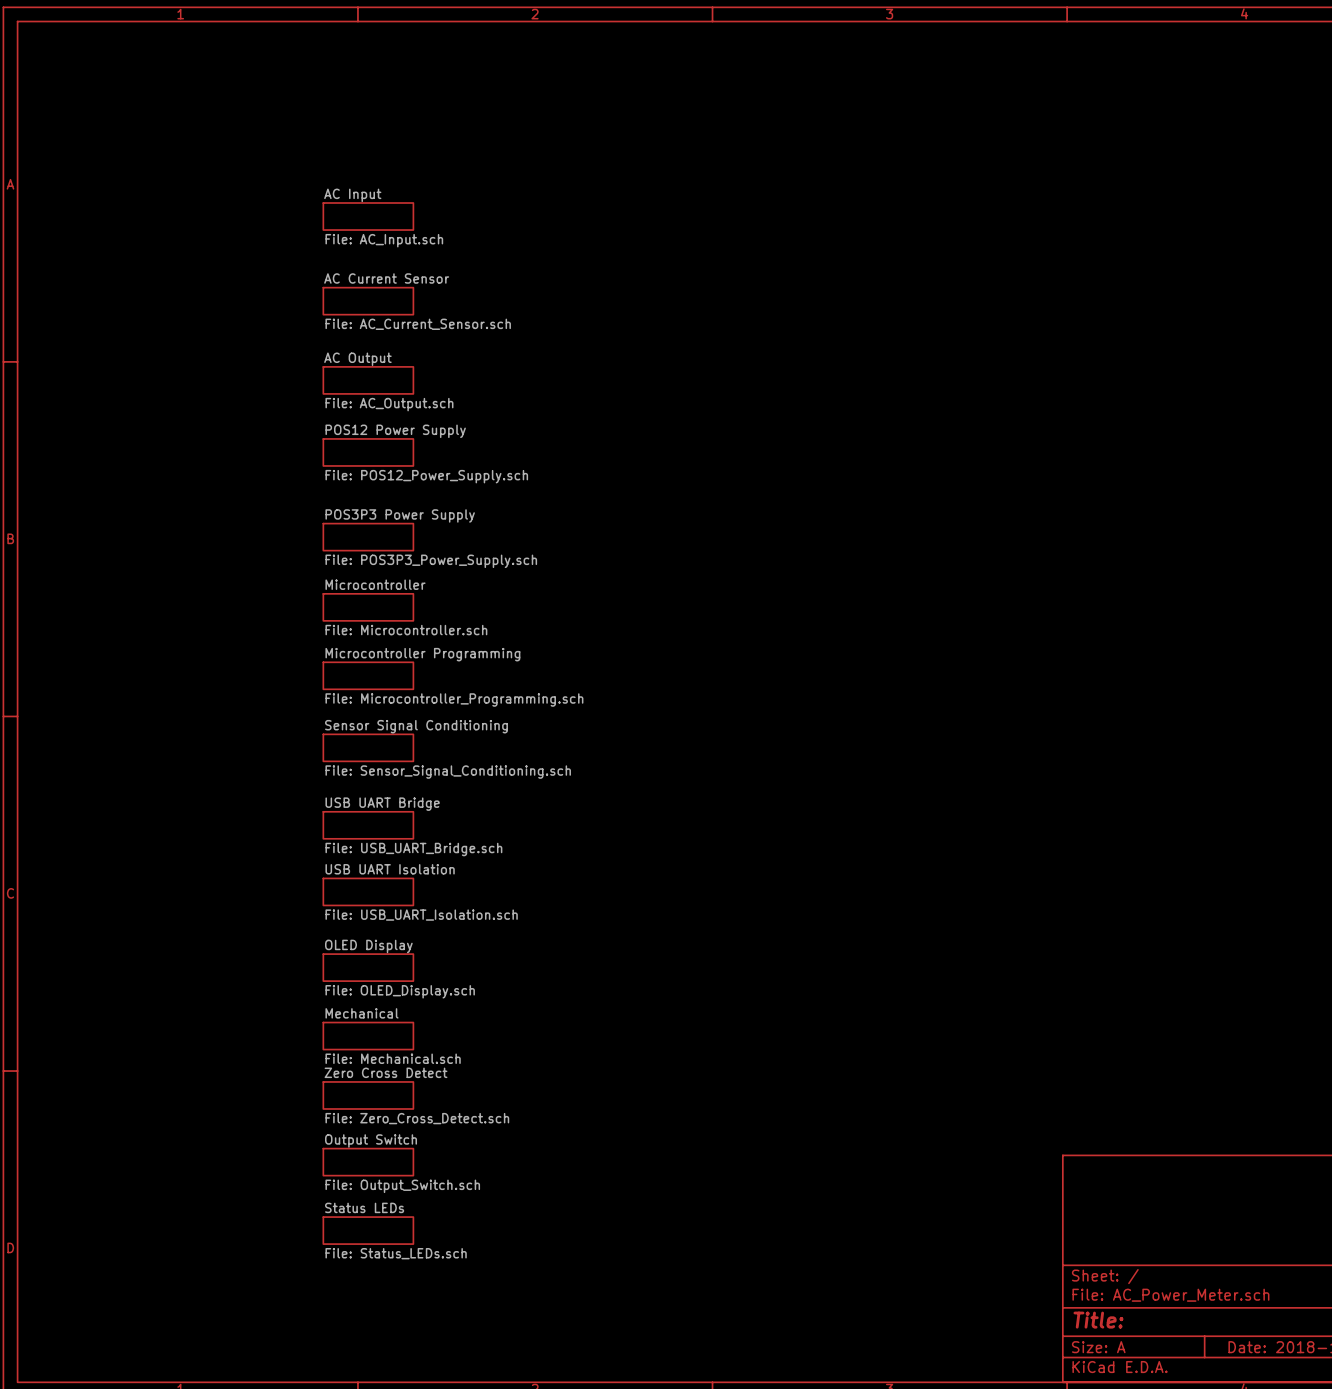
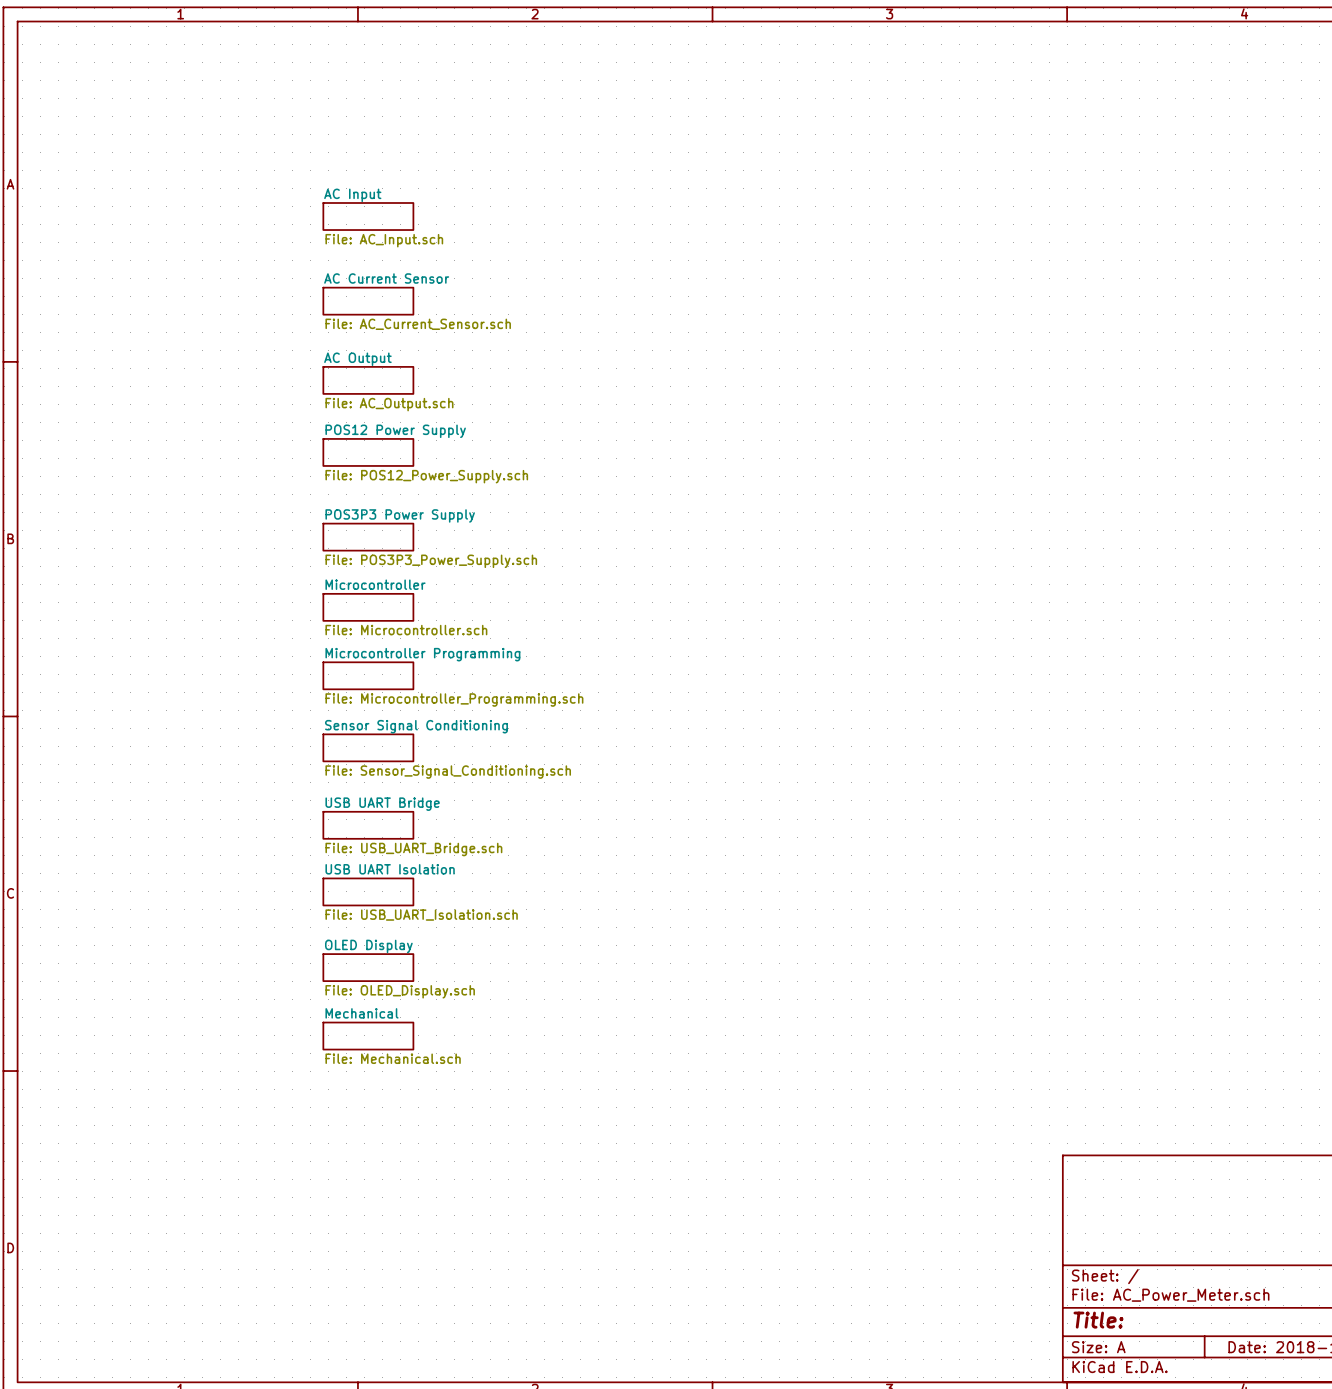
sheet Zero Cross Detect: File: Zero_Cross_Detect.sch (368, 1095) -> none
sheet Output Switch: File: Output_Switch.sch (368, 1162) -> none
sheet Status LEDs: File: Status_LEDs.sch (368, 1230) -> none

